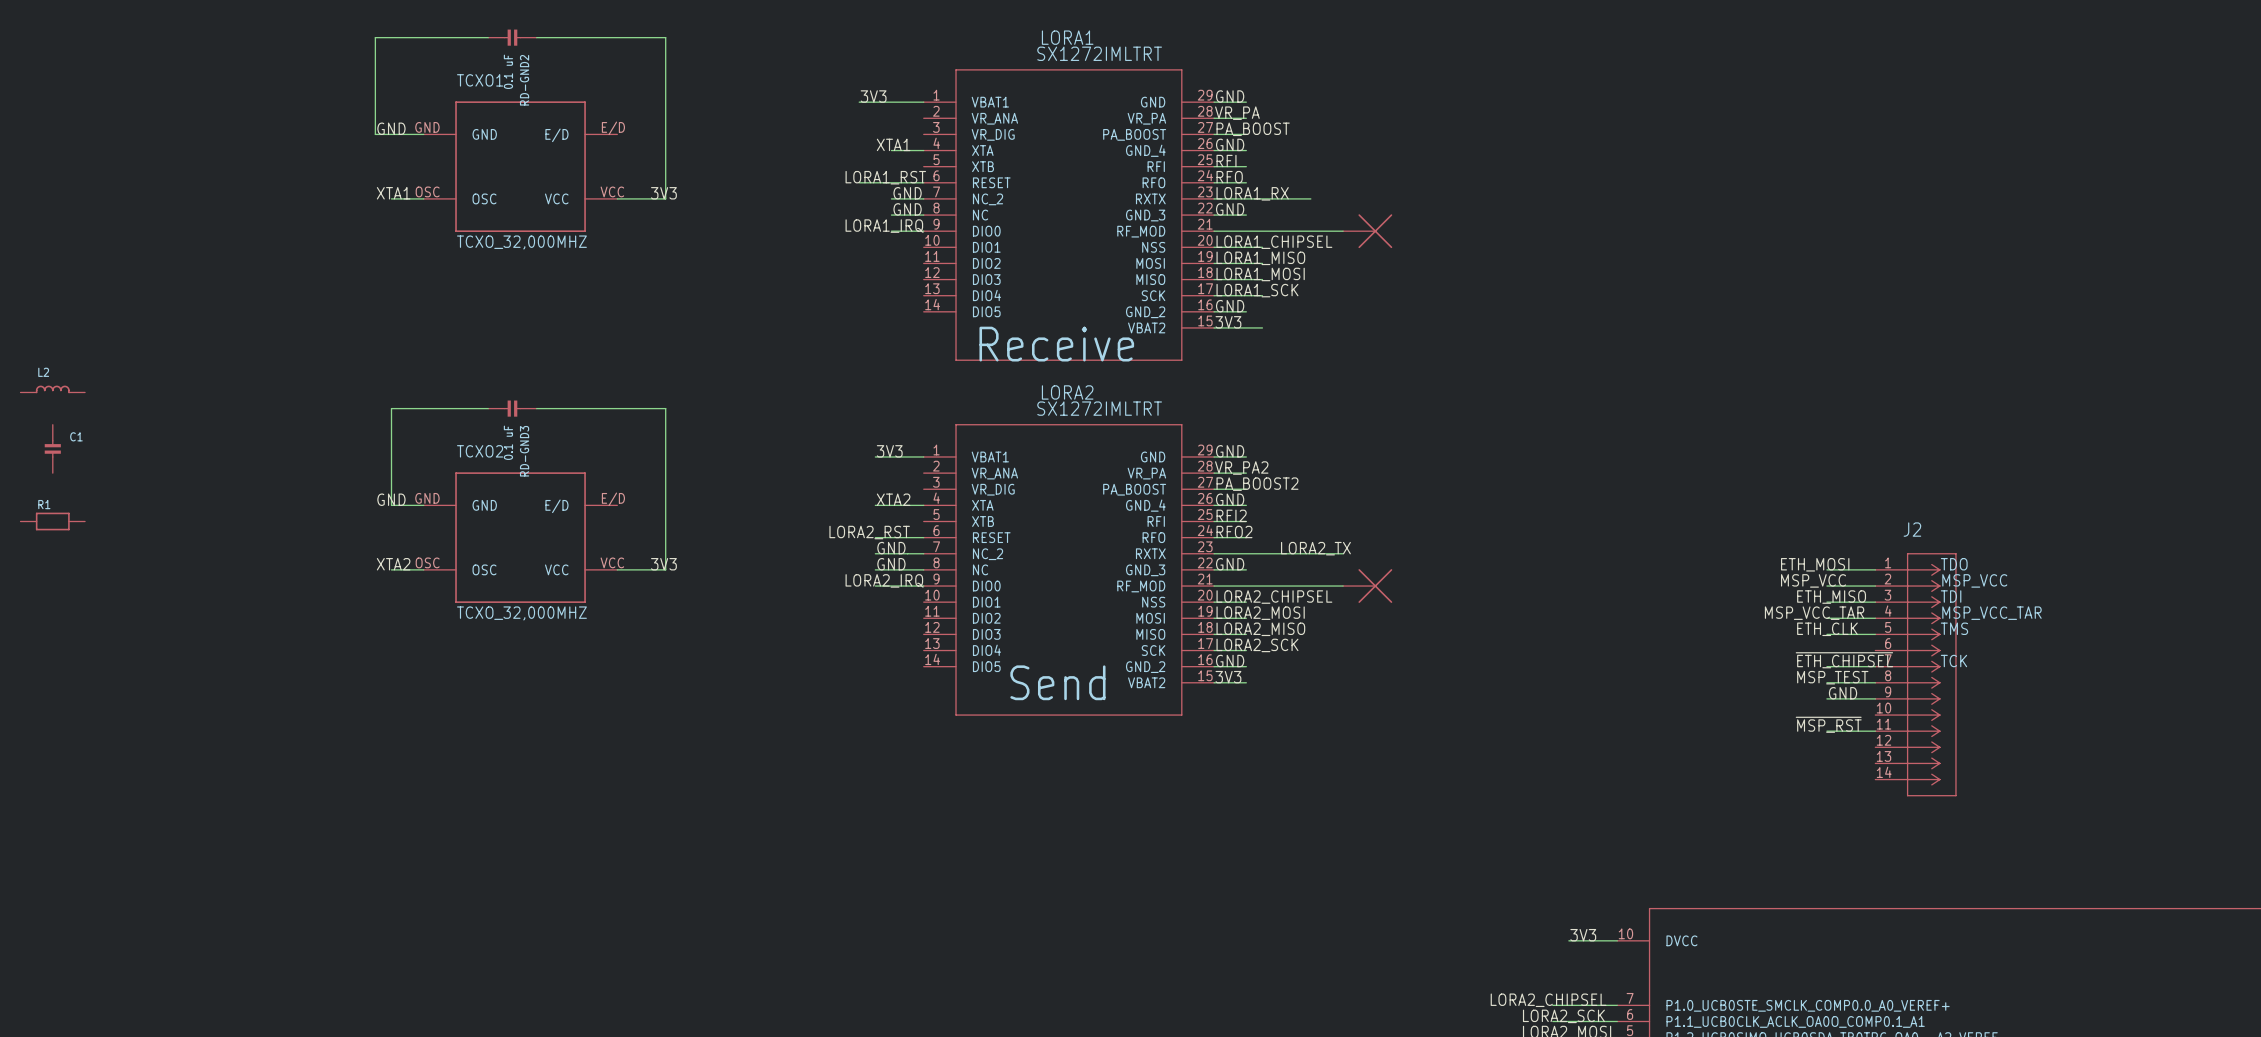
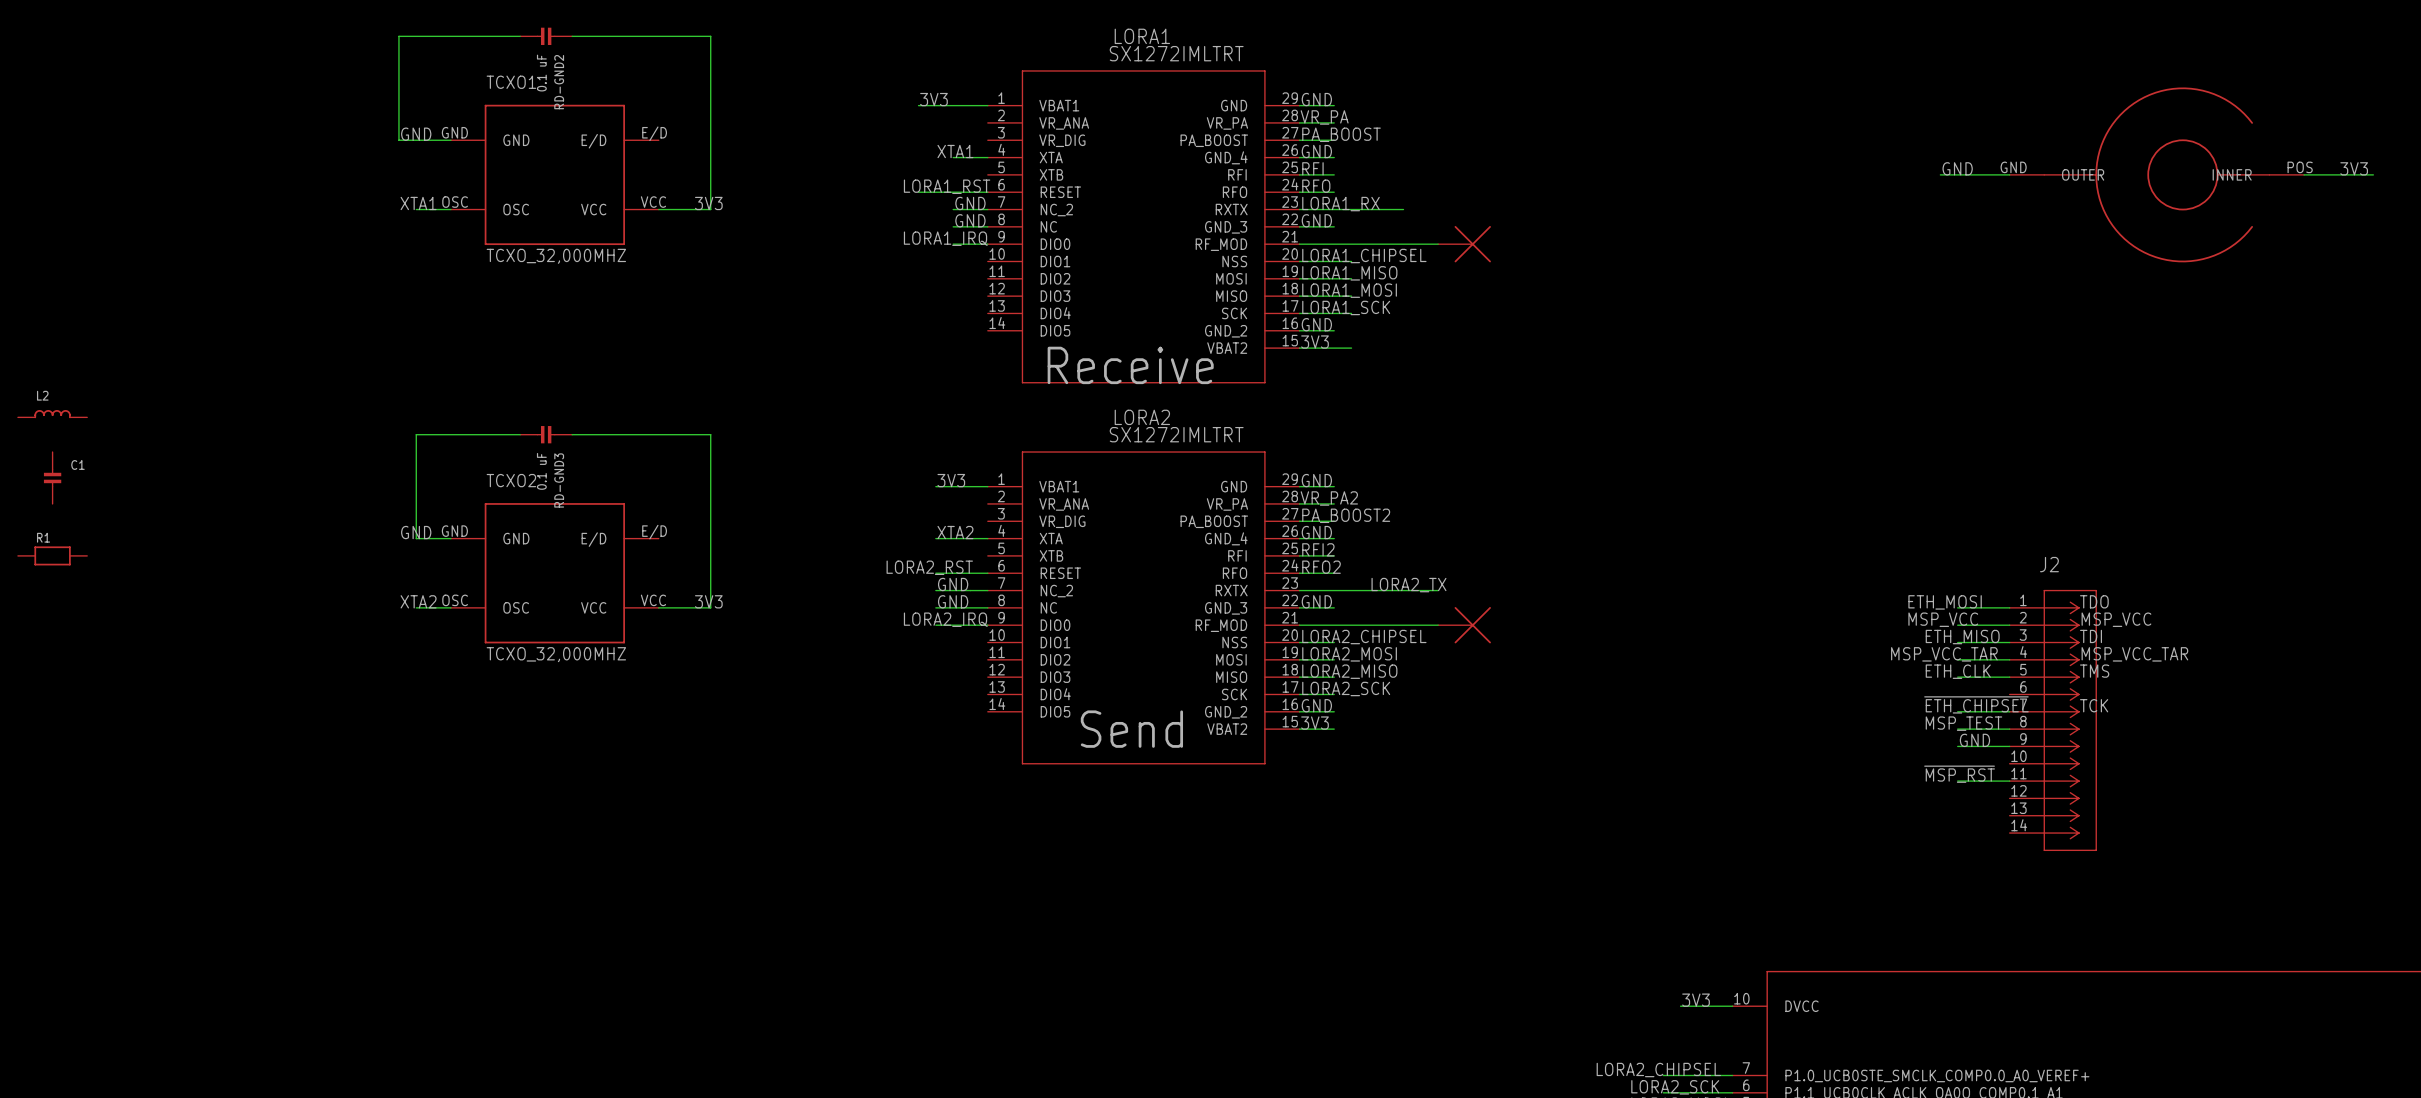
label: none -> GND (1957, 168)
label: none -> 3V3 (2354, 168)
wire: none -> (1940, 174) (2009, 174)
part: none -> (2156, 174)
wire: none -> (2304, 174) (2373, 174)

